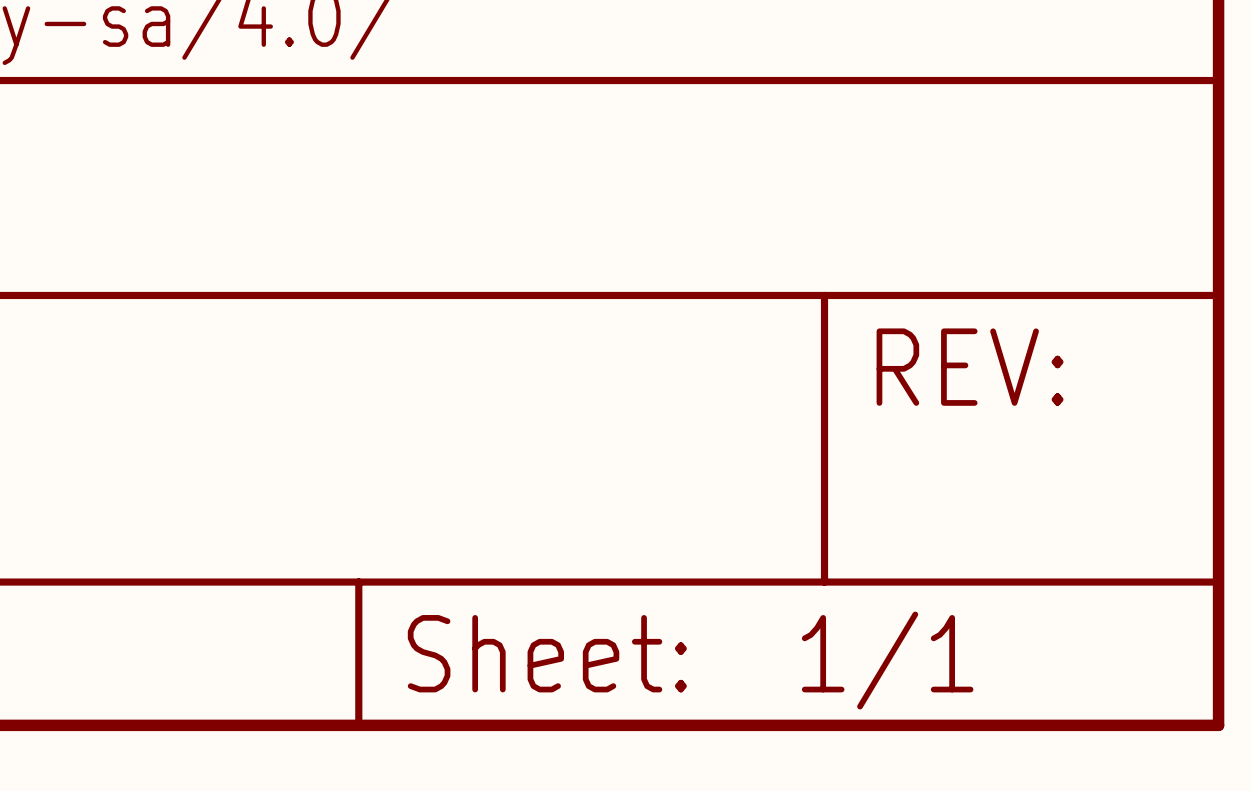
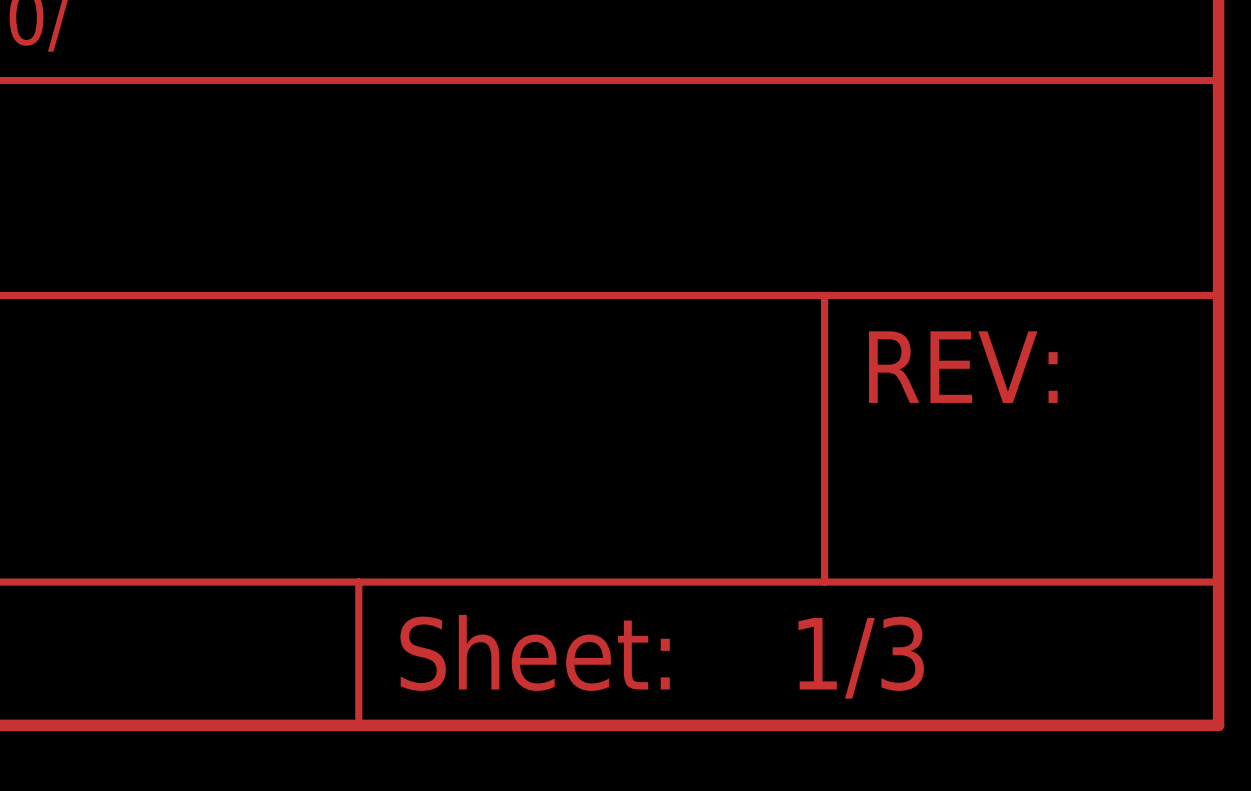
part text: 1/1 (887, 660) -> 1/3 (861, 657)

